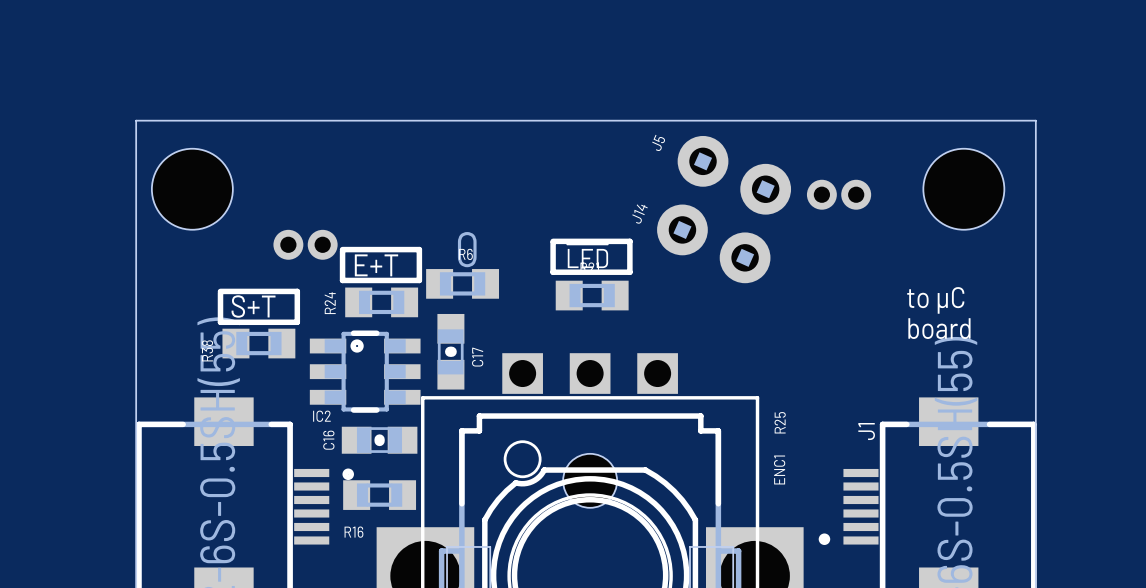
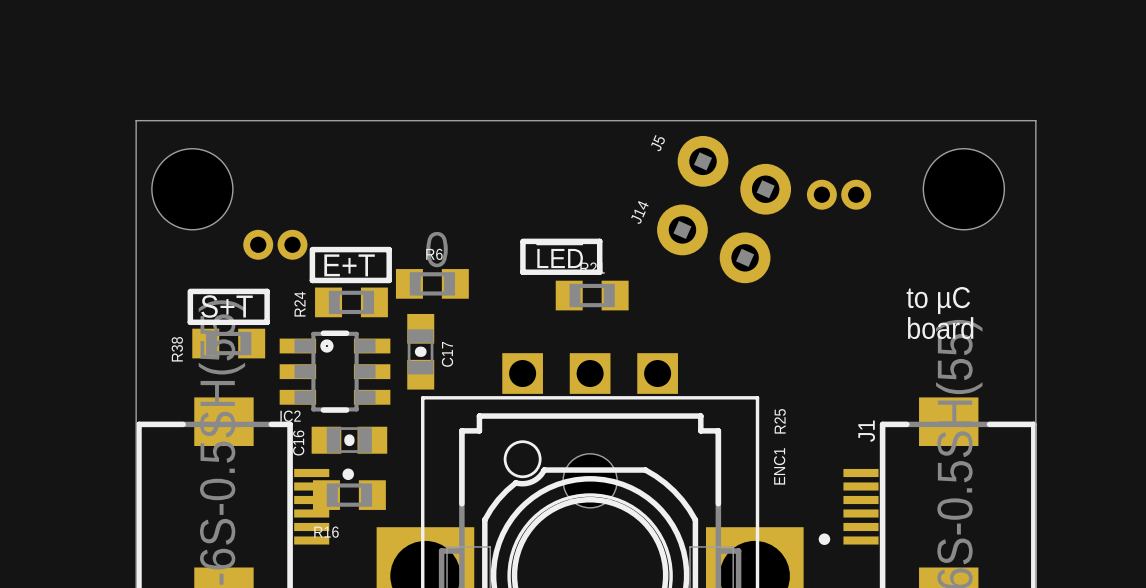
line: none -> (553, 241) (522, 241)
line: (599, 241) (629, 241) (629, 272) (599, 272) -> (599, 241) (599, 272)
line: (553, 242) (553, 272) -> (522, 242) (522, 272) (553, 272)
part position: (305, 244) -> (275, 244)
line: none -> (342, 249) (312, 249)
line: (389, 249) (419, 249) (419, 280) (389, 280) -> (389, 249) (389, 280)
line: (342, 250) (342, 280) -> (312, 250) (312, 280) (342, 280)
text position: ~{LED} (587, 256) -> ~{LED} (559, 256)
text position: E+T (376, 265) -> E+T (349, 265)
R6 position: (462, 283) -> (432, 283)
line: none -> (220, 291) (190, 291)
line: (267, 291) (297, 291) (297, 322) (267, 322) -> (267, 291) (267, 322)
line: (220, 292) (220, 322) -> (190, 292) (190, 322) (220, 322)
R24 position: (381, 302) -> (351, 302)
text position: S+T (253, 306) -> S+T (226, 306)
R38 position: (258, 343) -> (228, 343)
C17 position: (450, 351) -> (420, 351)
IC2 position: (365, 371) -> (335, 371)
C16 position: (379, 440) -> (349, 440)
R16 position: (379, 495) -> (349, 495)

